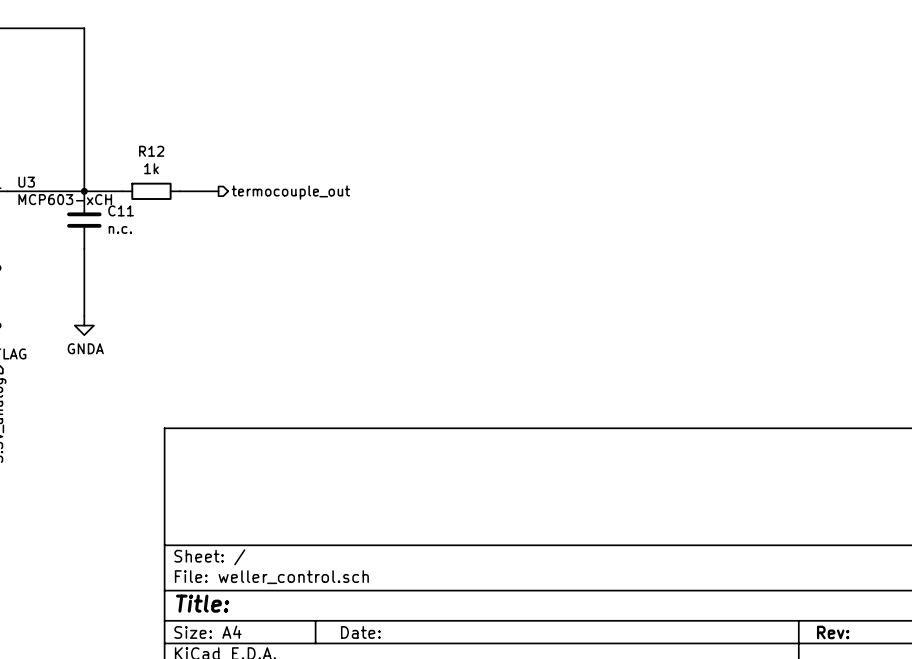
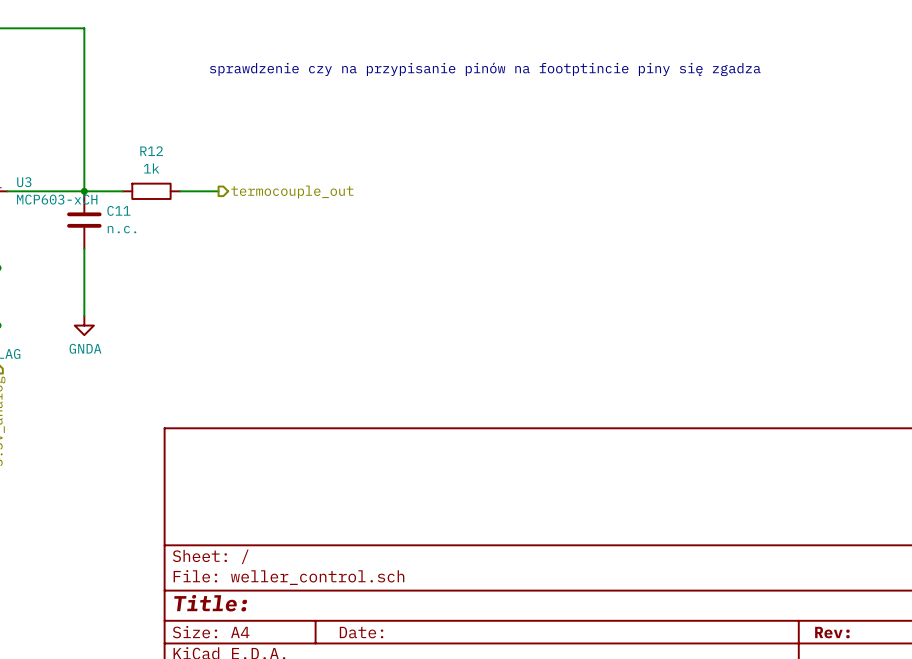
text: none -> sprawdzenie czy na przypisanie pinów na footptincie piny się zgadza (485, 69)

